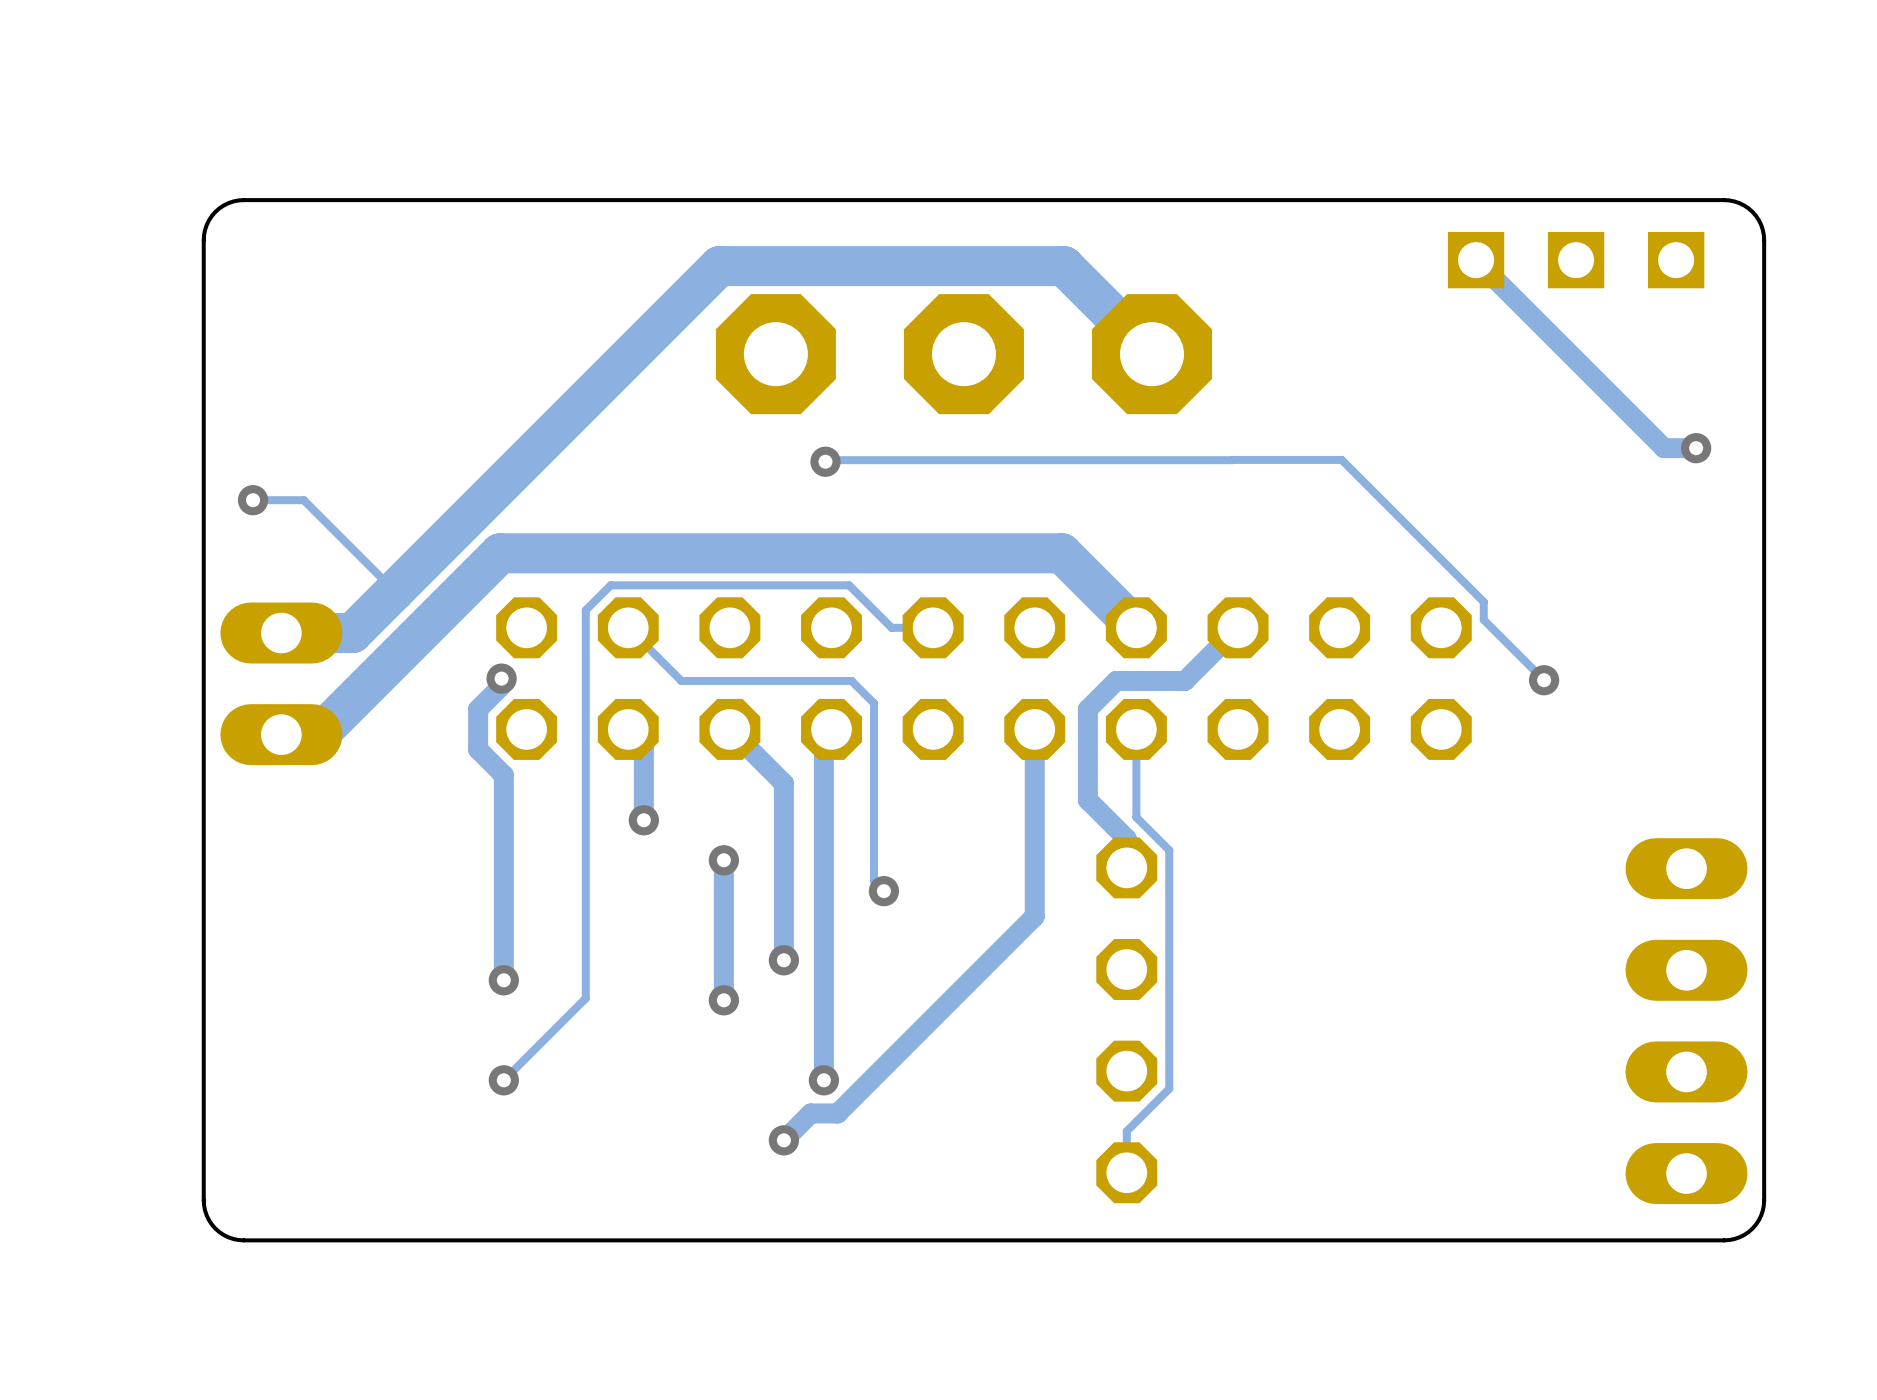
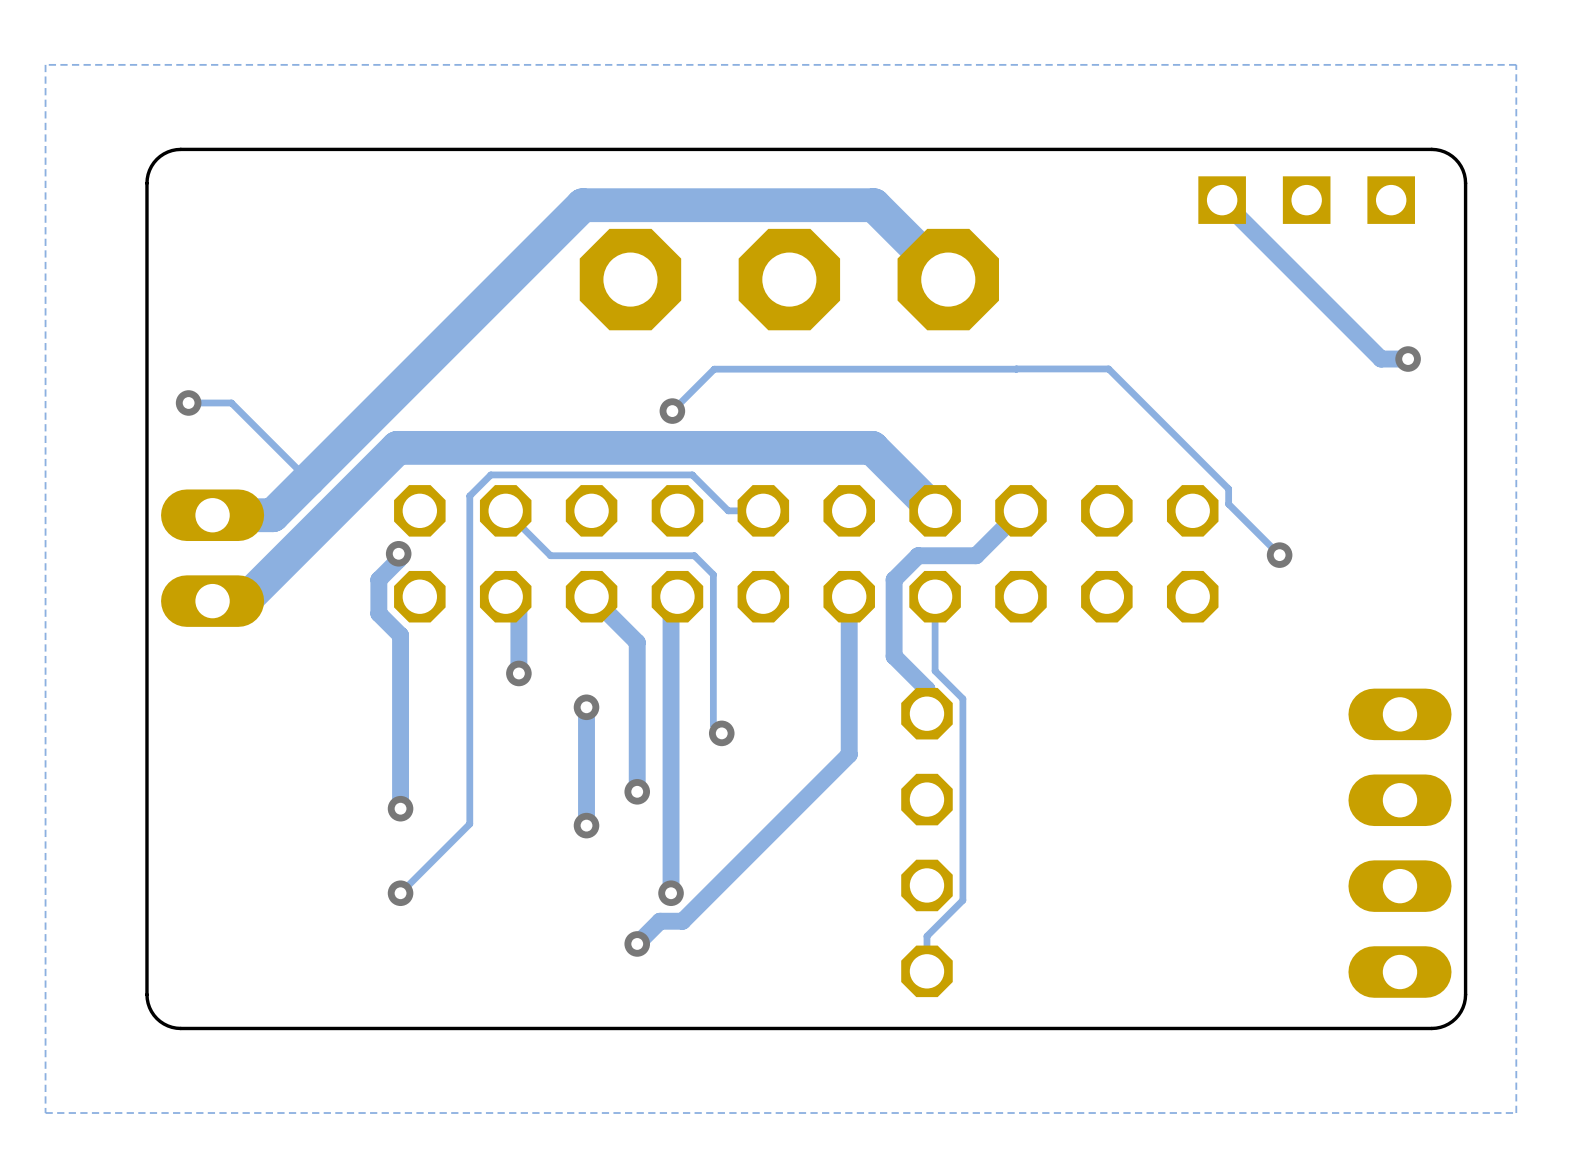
zone outline: none -> (1516, 64) (45, 64) (45, 1113) (1516, 1113) (1516, 64)
track: (875, 460) (827, 460) (825, 461) -> (714, 369) (672, 411)
via position: (825, 461) -> (672, 411)

